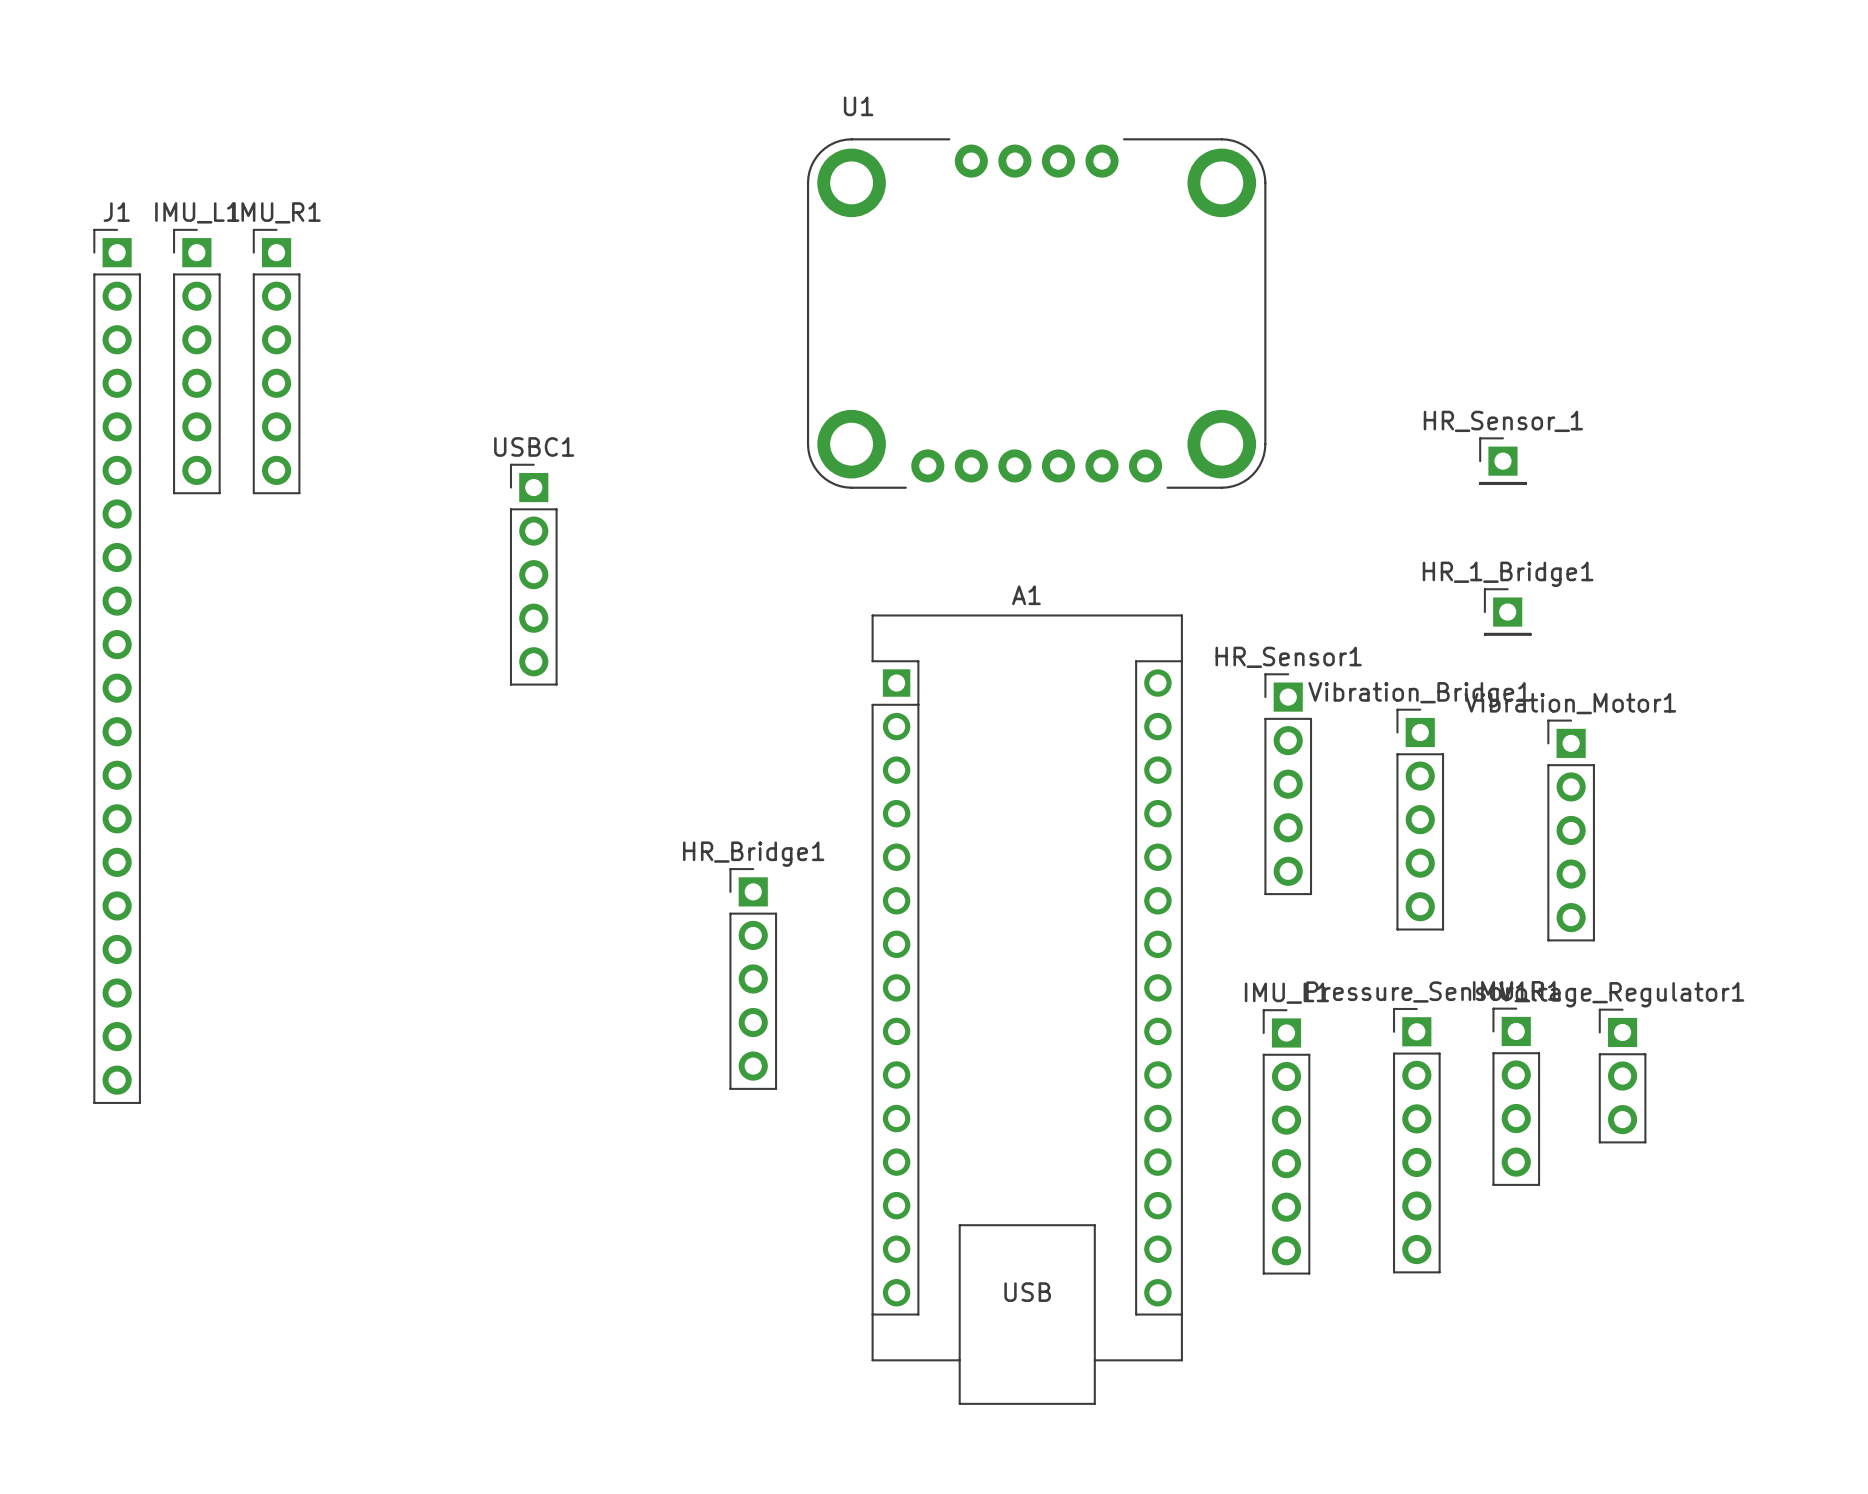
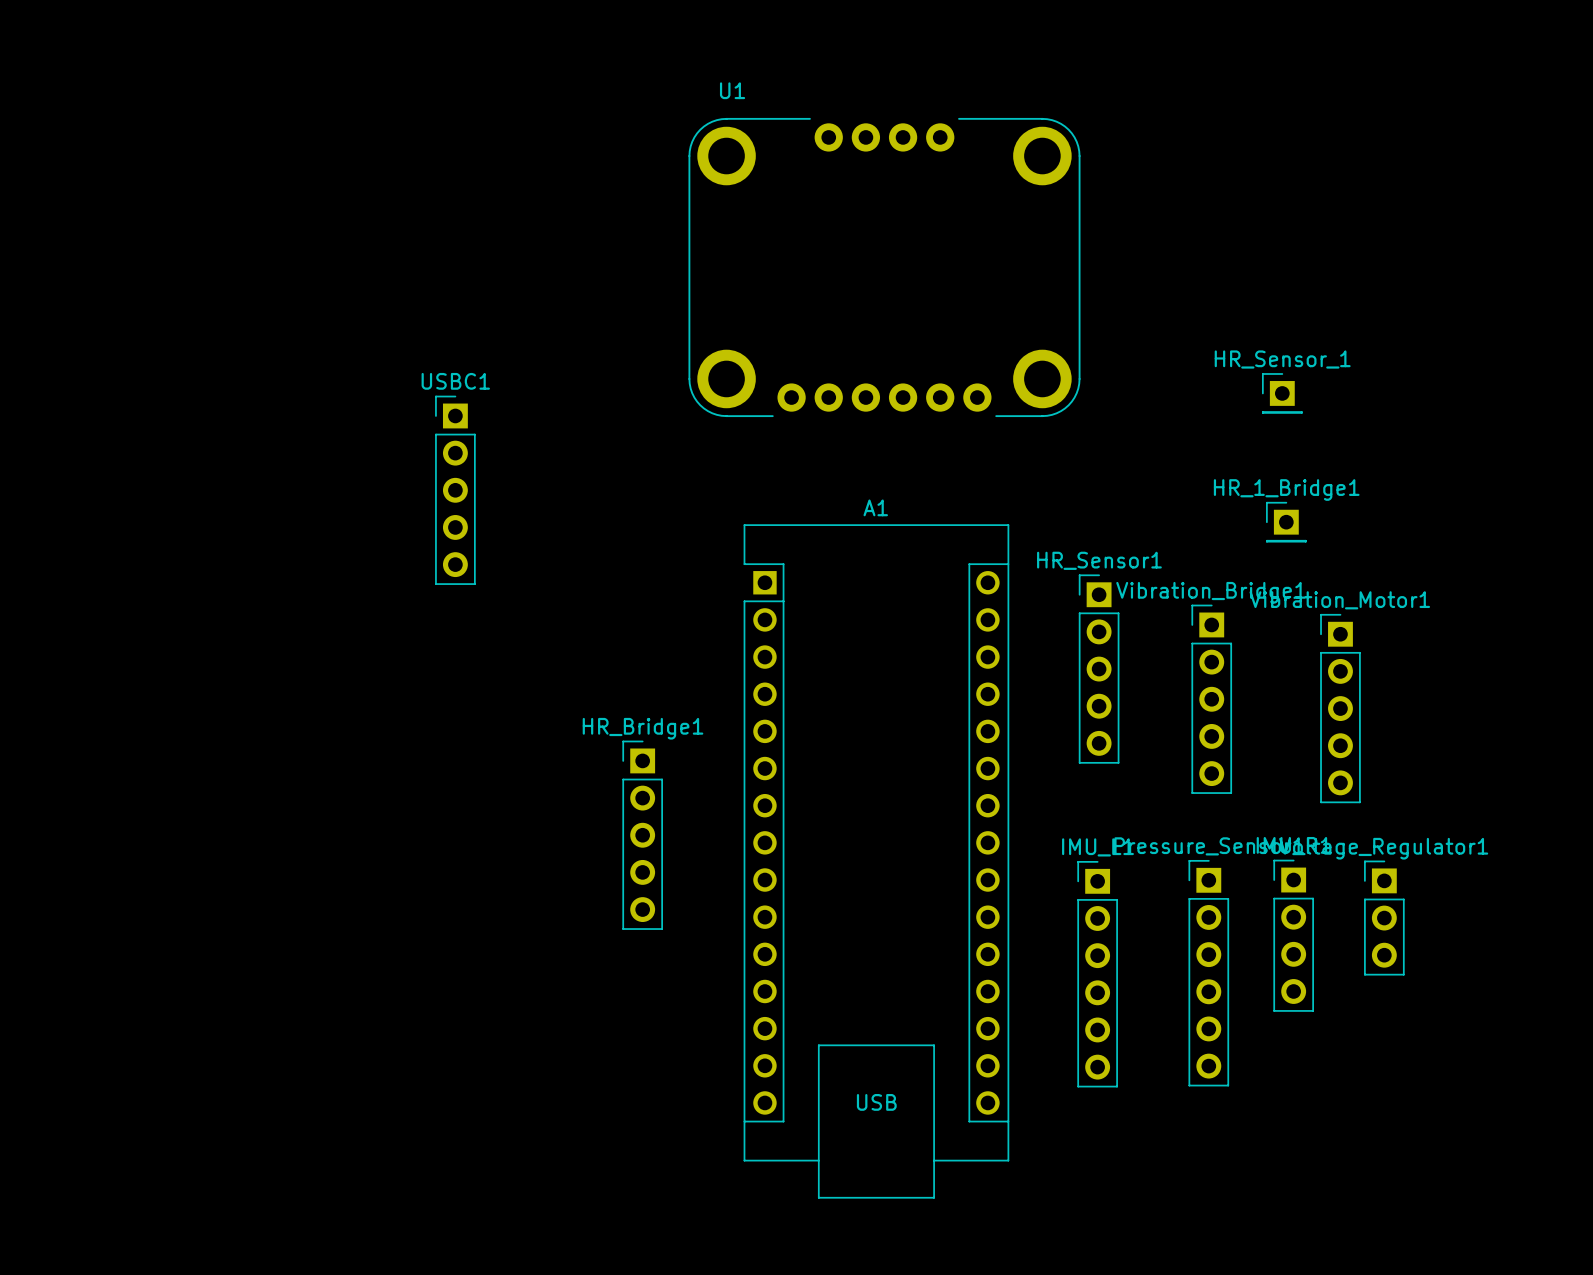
IMU_L1: (196, 361) -> none
IMU_R1: (276, 361) -> none
J1: (117, 666) -> none

